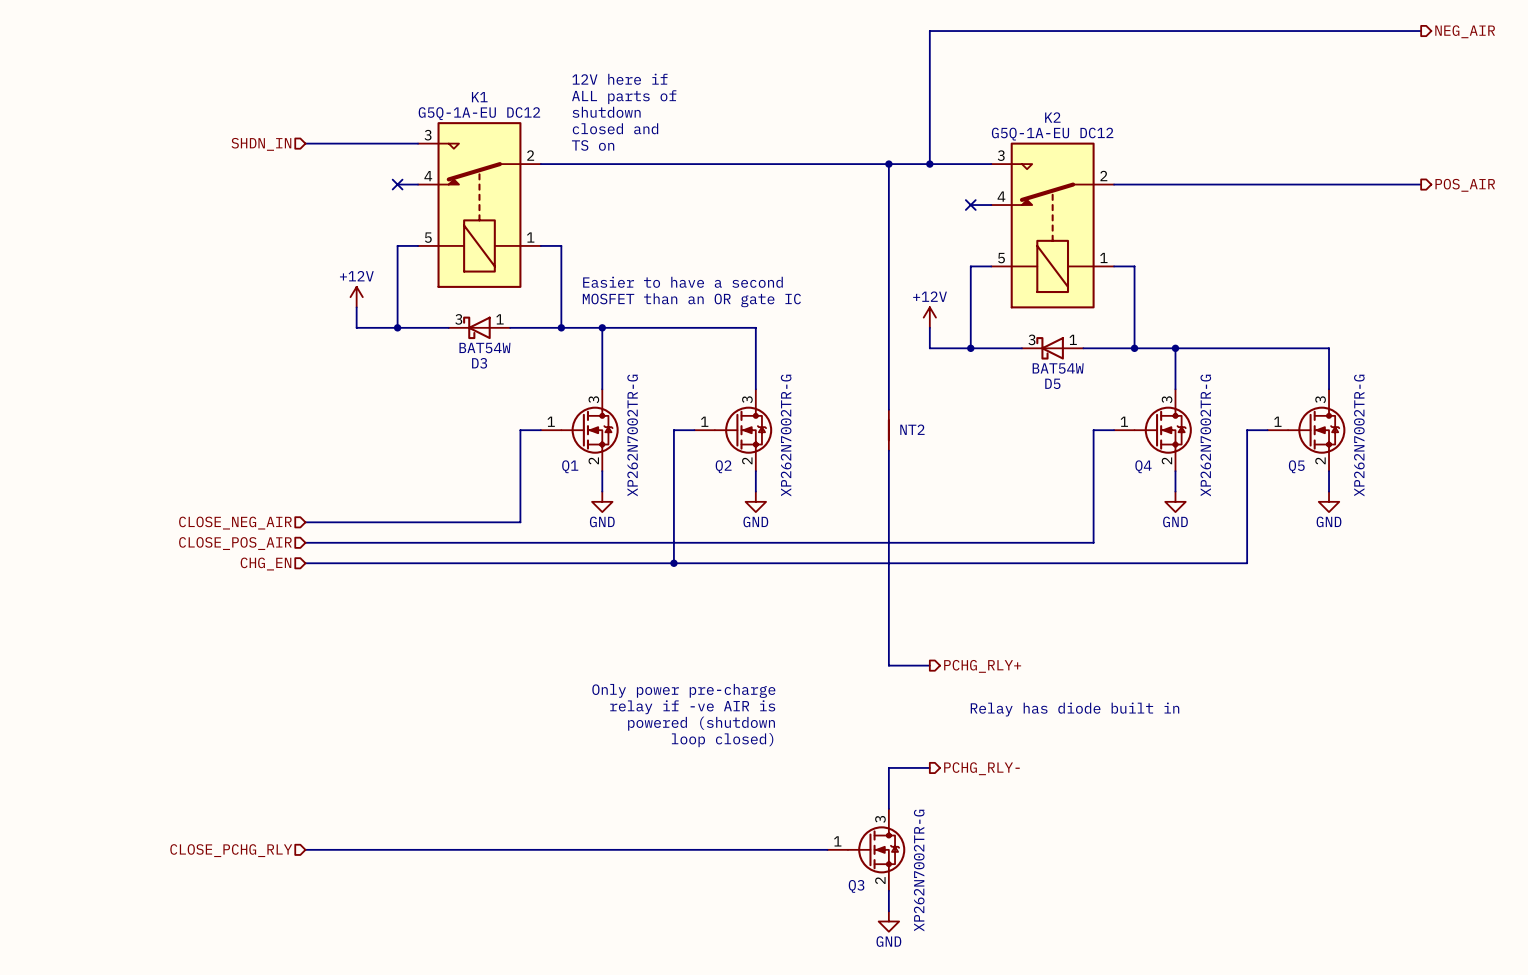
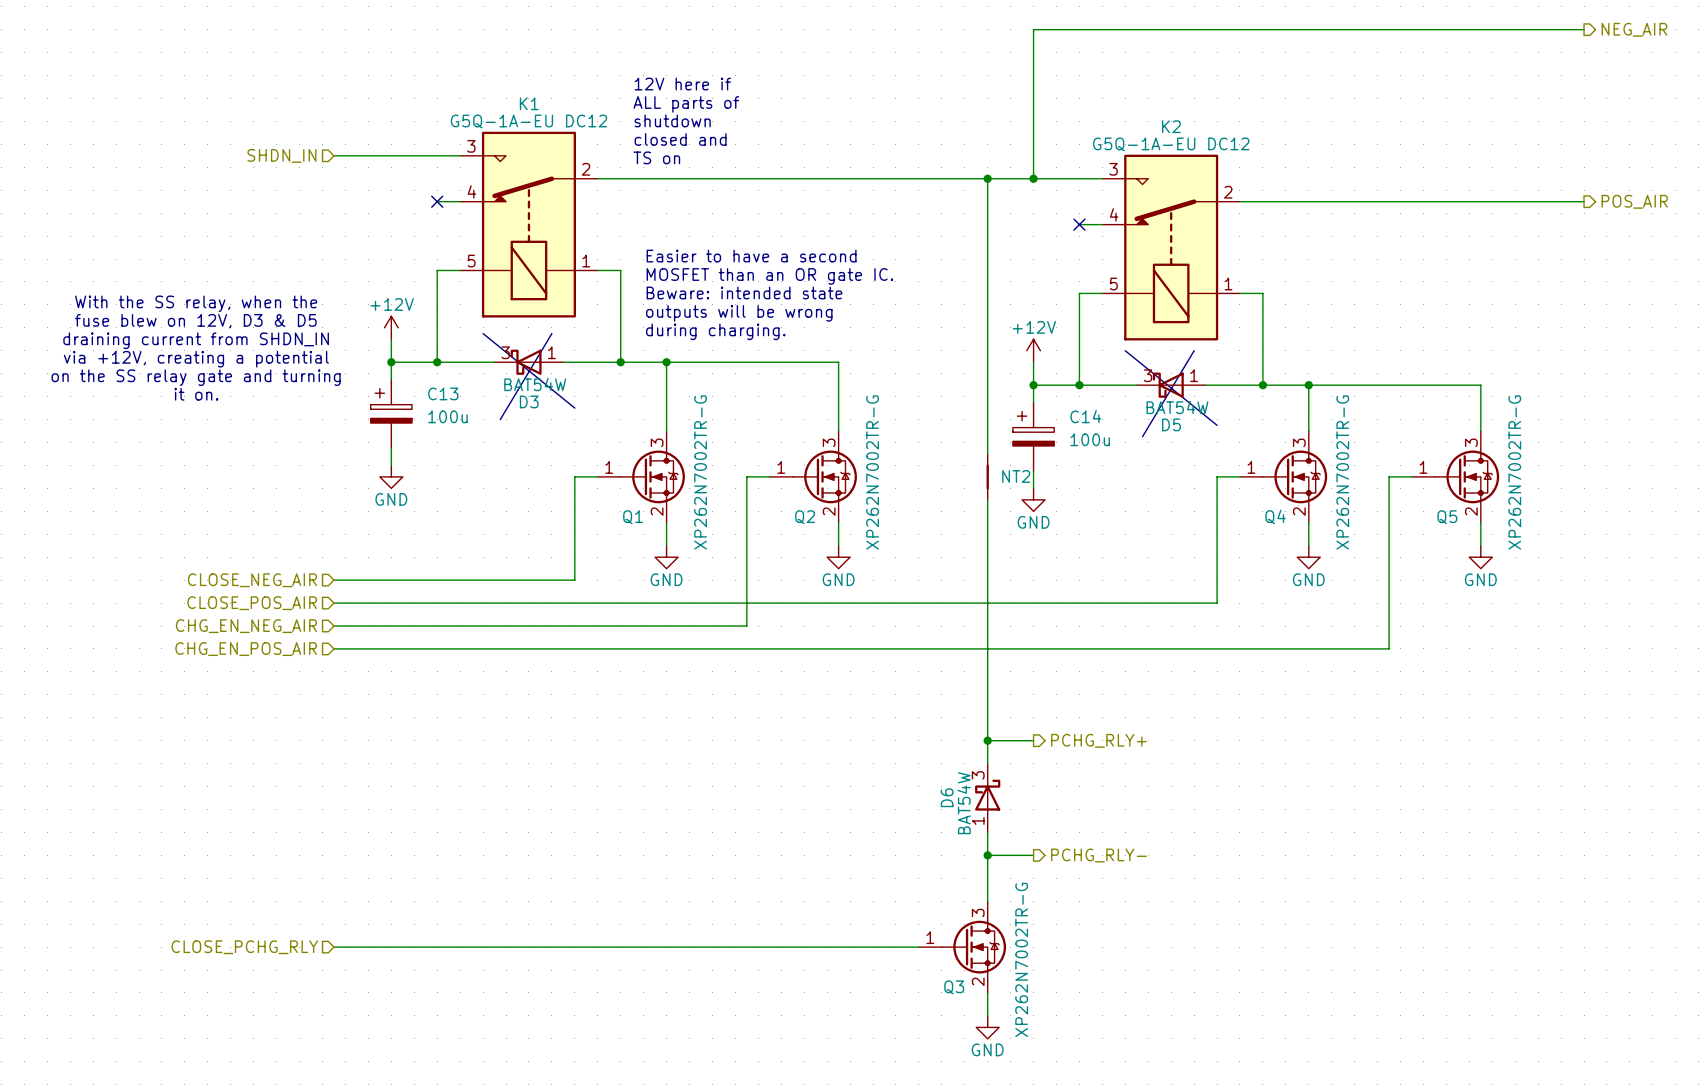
text: none -> Easier to have a second (751, 256)
text: none -> MOSFET than an OR gate IC. (769, 276)
text: none -> Beware: intended state (744, 292)
text: none -> With the SS relay, when the (196, 303)
text: Easier to have a second (682, 282) -> outputs will be wrong (739, 313)
text: none -> fuse blew on 12V, D3 & D5 (195, 321)
text: MOSFET than an OR gate IC (691, 300) -> during charging. (715, 331)
line: none -> (483, 333) (574, 408)
line: none -> (551, 333) (500, 419)
text: none -> draining current from SHDN_IN (196, 340)
line: none -> (1125, 350) (1217, 425)
line: none -> (1194, 350) (1142, 436)
text: none -> via +12V, creating a potential (196, 359)
wire: none -> (391, 362) (391, 379)
junction: none -> (391, 362)
text: none -> on the SS relay gate and turning (196, 377)
wire: none -> (1033, 385) (1033, 402)
junction: none -> (1033, 385)
text: none -> it on. (196, 394)
C13: none -> 100u (391, 413)
C14: none -> 100u (1033, 436)
wire: none -> (391, 448) (391, 465)
wire: none -> (1033, 471) (1033, 488)
power symbol: none -> GND (391, 476)
power symbol: none -> GND (1033, 499)
wire: (673, 563) (1247, 563) -> (334, 648) (1389, 648) (1389, 626)
junction: (673, 563) -> none
hierarchical label: CHG_EN (266, 564) -> CHG_EN_NEG_AIR (246, 626)
hierarchical label: none -> CHG_EN_POS_AIR (246, 649)
wire: none -> (987, 740) (987, 763)
junction: none -> (987, 740)
text: Only power pre-charge (683, 690) -> none
text: relay if -ve AIR is (692, 707) -> none
text: Relay has diode built in (1075, 709) -> none
D6: none -> BAT54W (987, 798)
text: powered (shutdown (701, 723) -> none
text: loop closed) (722, 740) -> none
wire: none -> (987, 832) (987, 855)
junction: none -> (987, 855)

